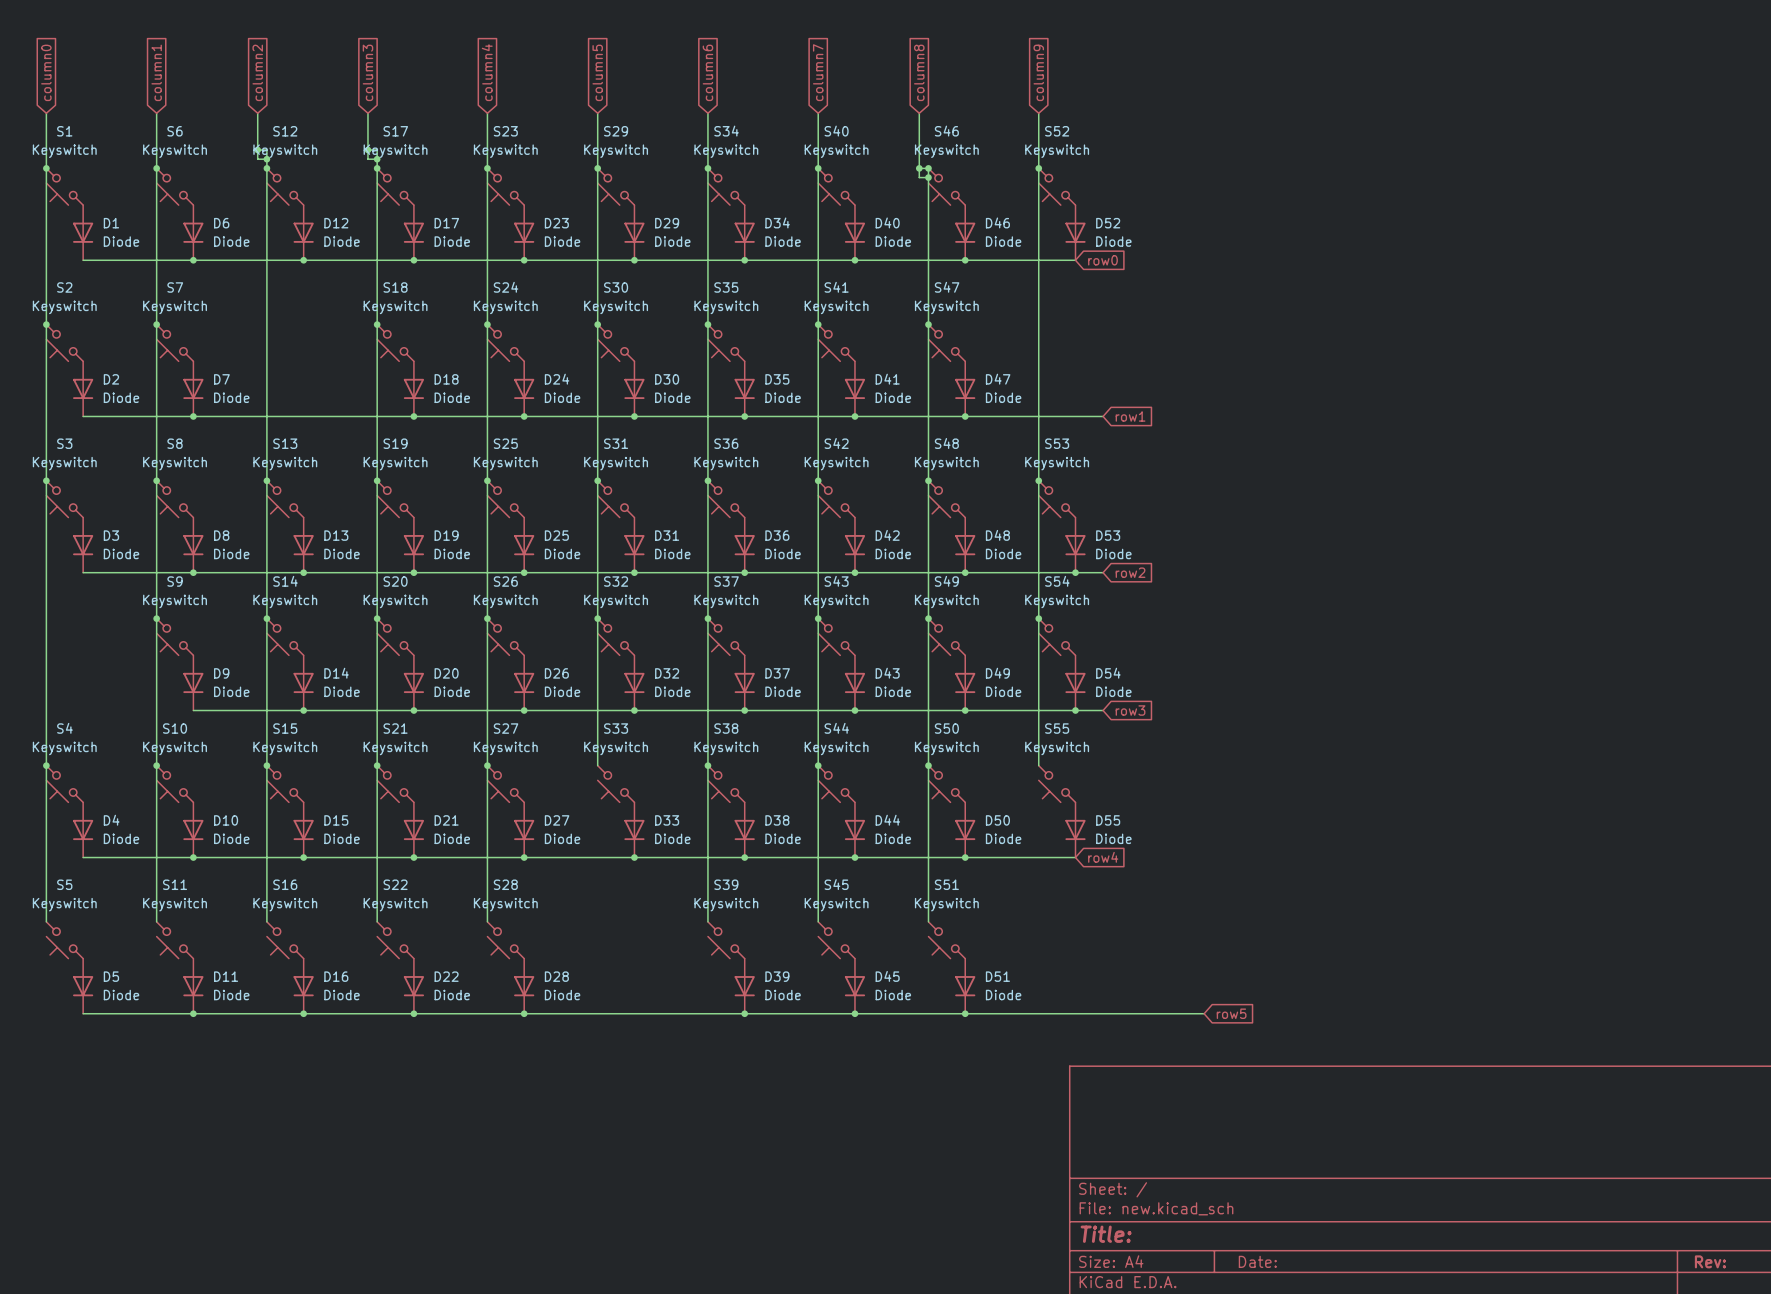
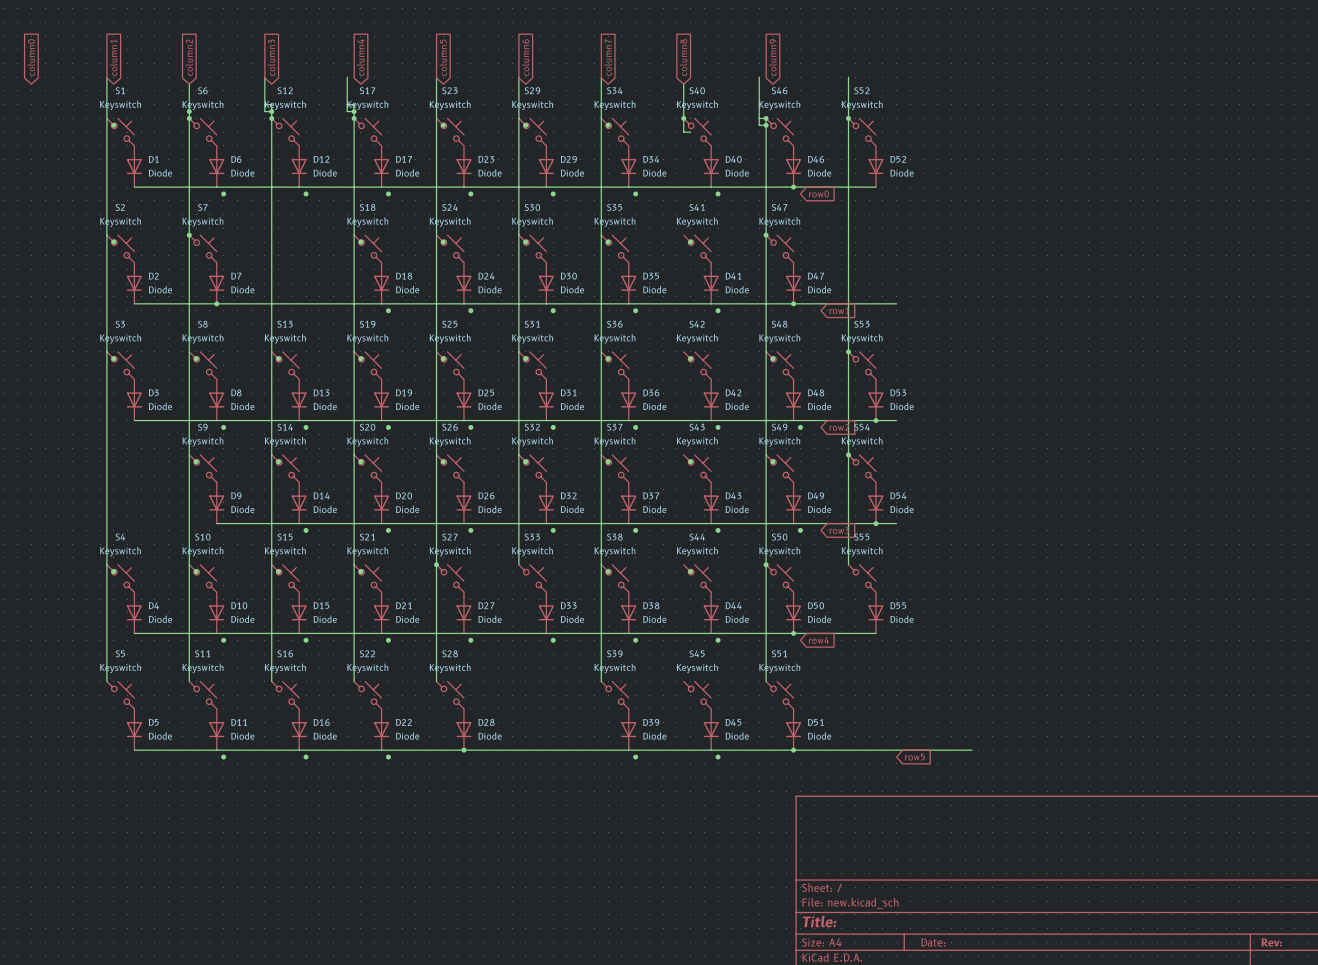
wire: none -> (347, 77) (347, 111) (354, 111)
wire: none -> (759, 77) (759, 125) (766, 125)
wire: (46, 113) (46, 921) -> (106, 77) (106, 681)
wire: (156, 113) (156, 921) -> none
wire: (367, 113) (367, 140) -> (264, 104) (271, 104)
wire: (487, 113) (487, 921) -> (436, 77) (436, 681)
wire: (597, 113) (597, 765) -> (518, 77) (518, 564)
wire: (707, 113) (707, 921) -> (601, 77) (601, 681)
wire: (818, 113) (818, 921) -> none
wire: (1038, 113) (1038, 765) -> (848, 77) (848, 564)
wire: none -> (347, 104) (354, 104) (354, 681)
wire: (257, 150) (266, 150) (266, 921) -> none
wire: (367, 150) (377, 150) (377, 921) -> (271, 111) (264, 111) (264, 77)
junction: none -> (354, 111)
wire: (257, 159) (266, 159) -> (189, 118) (189, 681)
junction: none -> (189, 118)
junction: (266, 159) -> none
wire: (367, 159) (377, 159) -> (271, 118) (271, 681)
junction: none -> (271, 118)
junction: (377, 159) -> none
junction: none -> (354, 118)
junction: none -> (683, 118)
junction: none -> (766, 118)
junction: none -> (848, 118)
junction: (46, 168) -> none
junction: (266, 168) -> none
junction: (377, 168) -> none
junction: (487, 168) -> none
wire: (919, 168) (928, 168) (928, 921) -> (759, 118) (766, 118) (766, 681)
junction: (919, 168) -> none
junction: (928, 168) -> none
junction: none -> (766, 125)
junction: (1038, 168) -> none
junction: (928, 177) -> none
S1 rotation: 0° (64, 186) -> 180° (120, 132)
S1 position: (64, 186) -> (120, 132)
S6 rotation: 0° (175, 186) -> 180° (203, 132)
S6 position: (175, 186) -> (203, 132)
S12 rotation: 0° (285, 186) -> 180° (285, 132)
S12 position: (285, 186) -> (285, 132)
S17 rotation: 0° (395, 186) -> 180° (367, 132)
S17 position: (395, 186) -> (367, 132)
S23 rotation: 0° (505, 186) -> 180° (450, 132)
S23 position: (505, 186) -> (450, 132)
S29 rotation: 0° (616, 186) -> 180° (532, 132)
S29 position: (616, 186) -> (532, 132)
S34 rotation: 0° (726, 186) -> 180° (615, 132)
S34 position: (726, 186) -> (615, 132)
S40 rotation: 0° (836, 186) -> 180° (697, 132)
S40 position: (836, 186) -> (697, 132)
S46 rotation: 0° (946, 186) -> 180° (779, 132)
S46 position: (946, 186) -> (779, 132)
S52 rotation: 0° (1057, 186) -> 180° (862, 132)
S52 position: (1057, 186) -> (862, 132)
D1 position: (83, 232) -> (134, 166)
D6 position: (193, 232) -> (216, 166)
D12 position: (303, 232) -> (299, 166)
D17 position: (413, 232) -> (381, 166)
D23 position: (524, 232) -> (463, 166)
D29 position: (634, 232) -> (546, 166)
D34 position: (744, 232) -> (628, 166)
D40 position: (854, 232) -> (711, 166)
D46 position: (965, 232) -> (793, 166)
D52 position: (1075, 232) -> (875, 166)
junction: none -> (793, 187)
wire: (83, 260) (1075, 260) -> (134, 187) (875, 187)
junction: (193, 260) -> none
junction: none -> (189, 235)
junction: none -> (766, 235)
junction: (46, 324) -> none
junction: (377, 324) -> none
S2 rotation: 0° (64, 342) -> 180° (120, 248)
S2 position: (64, 342) -> (120, 248)
S7 rotation: 0° (175, 342) -> 180° (203, 248)
S7 position: (175, 342) -> (203, 248)
S18 rotation: 0° (395, 342) -> 180° (367, 248)
S18 position: (395, 342) -> (367, 248)
S24 rotation: 0° (505, 342) -> 180° (450, 248)
S24 position: (505, 342) -> (450, 248)
S30 rotation: 0° (616, 342) -> 180° (532, 248)
S30 position: (616, 342) -> (532, 248)
S35 rotation: 0° (726, 342) -> 180° (615, 248)
S35 position: (726, 342) -> (615, 248)
S41 rotation: 0° (836, 342) -> 180° (697, 248)
S41 position: (836, 342) -> (697, 248)
S47 rotation: 0° (946, 342) -> 180° (779, 248)
S47 position: (946, 342) -> (779, 248)
D2 position: (83, 388) -> (134, 283)
D7 position: (193, 388) -> (216, 283)
D18 position: (413, 388) -> (381, 283)
D24 position: (524, 388) -> (463, 283)
D30 position: (634, 388) -> (546, 283)
D35 position: (744, 388) -> (628, 283)
D41 position: (854, 388) -> (711, 283)
D47 position: (965, 388) -> (793, 283)
junction: none -> (216, 303)
junction: none -> (793, 303)
wire: (83, 416) (1103, 416) -> (134, 303) (896, 303)
junction: (193, 416) -> none
junction: (413, 416) -> none
junction: none -> (848, 351)
junction: (46, 480) -> none
S3 rotation: 0° (64, 499) -> 180° (120, 365)
S3 position: (64, 499) -> (120, 365)
S8 rotation: 0° (175, 499) -> 180° (203, 365)
S8 position: (175, 499) -> (203, 365)
S13 rotation: 0° (285, 499) -> 180° (285, 365)
S13 position: (285, 499) -> (285, 365)
S19 rotation: 0° (395, 499) -> 180° (367, 365)
S19 position: (395, 499) -> (367, 365)
S25 rotation: 0° (505, 499) -> 180° (450, 365)
S25 position: (505, 499) -> (450, 365)
S31 rotation: 0° (616, 499) -> 180° (532, 365)
S31 position: (616, 499) -> (532, 365)
S36 rotation: 0° (726, 499) -> 180° (615, 365)
S36 position: (726, 499) -> (615, 365)
S42 rotation: 0° (836, 499) -> 180° (697, 365)
S42 position: (836, 499) -> (697, 365)
S48 rotation: 0° (946, 499) -> 180° (779, 365)
S48 position: (946, 499) -> (779, 365)
S53 rotation: 0° (1057, 499) -> 180° (862, 365)
S53 position: (1057, 499) -> (862, 365)
D3 position: (83, 545) -> (134, 399)
D8 position: (193, 545) -> (216, 399)
D13 position: (303, 545) -> (299, 399)
D19 position: (413, 545) -> (381, 399)
D25 position: (524, 545) -> (463, 399)
D31 position: (634, 545) -> (546, 399)
D36 position: (744, 545) -> (628, 399)
D42 position: (854, 545) -> (711, 399)
D48 position: (965, 545) -> (793, 399)
D53 position: (1075, 545) -> (875, 399)
junction: none -> (875, 420)
wire: (83, 572) (1103, 572) -> (134, 420) (896, 420)
junction: (193, 572) -> none
junction: none -> (848, 454)
junction: (156, 618) -> none
S9 rotation: 0° (175, 637) -> 180° (203, 468)
S9 position: (175, 637) -> (203, 468)
S14 rotation: 0° (285, 637) -> 180° (285, 468)
S14 position: (285, 637) -> (285, 468)
S20 rotation: 0° (395, 637) -> 180° (367, 468)
S20 position: (395, 637) -> (367, 468)
S26 rotation: 0° (505, 637) -> 180° (450, 468)
S26 position: (505, 637) -> (450, 468)
S32 rotation: 0° (616, 637) -> 180° (532, 468)
S32 position: (616, 637) -> (532, 468)
S37 rotation: 0° (726, 637) -> 180° (615, 468)
S37 position: (726, 637) -> (615, 468)
S43 rotation: 0° (836, 637) -> 180° (697, 468)
S43 position: (836, 637) -> (697, 468)
S49 rotation: 0° (946, 637) -> 180° (779, 468)
S49 position: (946, 637) -> (779, 468)
S54 rotation: 0° (1057, 637) -> 180° (862, 468)
S54 position: (1057, 637) -> (862, 468)
D9 position: (193, 682) -> (216, 502)
D14 position: (303, 682) -> (299, 502)
D20 position: (413, 682) -> (381, 502)
D26 position: (524, 682) -> (463, 502)
D32 position: (634, 682) -> (546, 502)
D37 position: (744, 682) -> (628, 502)
D43 position: (854, 682) -> (711, 502)
D49 position: (965, 682) -> (793, 502)
D54 position: (1075, 682) -> (875, 502)
junction: none -> (875, 523)
wire: (193, 710) (1103, 710) -> (216, 523) (896, 523)
junction: (303, 710) -> none
junction: none -> (436, 564)
junction: none -> (766, 564)
junction: (46, 765) -> none
junction: (707, 765) -> none
S4 rotation: 0° (64, 784) -> 180° (120, 578)
S4 position: (64, 784) -> (120, 578)
S10 rotation: 0° (175, 784) -> 180° (203, 578)
S10 position: (175, 784) -> (203, 578)
S15 rotation: 0° (285, 784) -> 180° (285, 578)
S15 position: (285, 784) -> (285, 578)
S21 rotation: 0° (395, 784) -> 180° (367, 578)
S21 position: (395, 784) -> (367, 578)
S27 rotation: 0° (505, 784) -> 180° (450, 578)
S27 position: (505, 784) -> (450, 578)
S33 rotation: 0° (616, 784) -> 180° (532, 578)
S33 position: (616, 784) -> (532, 578)
S38 rotation: 0° (726, 784) -> 180° (615, 578)
S38 position: (726, 784) -> (615, 578)
S44 rotation: 0° (836, 784) -> 180° (697, 578)
S44 position: (836, 784) -> (697, 578)
S50 rotation: 0° (946, 784) -> 180° (779, 578)
S50 position: (946, 784) -> (779, 578)
S55 rotation: 0° (1057, 784) -> 180° (862, 578)
S55 position: (1057, 784) -> (862, 578)
D4 position: (83, 829) -> (134, 612)
D10 position: (193, 829) -> (216, 612)
D15 position: (303, 829) -> (299, 612)
D21 position: (413, 829) -> (381, 612)
D27 position: (524, 829) -> (463, 612)
D33 position: (634, 829) -> (546, 612)
D38 position: (744, 829) -> (628, 612)
D44 position: (854, 829) -> (711, 612)
D50 position: (965, 829) -> (793, 612)
D55 position: (1075, 829) -> (875, 612)
junction: none -> (793, 633)
wire: (83, 857) (1075, 857) -> (134, 633) (875, 633)
junction: (193, 857) -> none
S5 rotation: 0° (64, 940) -> 180° (120, 695)
S5 position: (64, 940) -> (120, 695)
S11 rotation: 0° (175, 940) -> 180° (203, 695)
S11 position: (175, 940) -> (203, 695)
S16 rotation: 0° (285, 940) -> 180° (285, 695)
S16 position: (285, 940) -> (285, 695)
S22 rotation: 0° (395, 940) -> 180° (367, 695)
S22 position: (395, 940) -> (367, 695)
S28 rotation: 0° (505, 940) -> 180° (450, 695)
S28 position: (505, 940) -> (450, 695)
S39 rotation: 0° (726, 940) -> 180° (615, 695)
S39 position: (726, 940) -> (615, 695)
S45 rotation: 0° (836, 940) -> 180° (697, 695)
S45 position: (836, 940) -> (697, 695)
S51 rotation: 0° (946, 940) -> 180° (779, 695)
S51 position: (946, 940) -> (779, 695)
D5 position: (83, 986) -> (134, 729)
D11 position: (193, 986) -> (216, 729)
D16 position: (303, 986) -> (299, 729)
D22 position: (413, 986) -> (381, 729)
D28 position: (524, 986) -> (463, 729)
D39 position: (744, 986) -> (628, 729)
D45 position: (854, 986) -> (711, 729)
D51 position: (965, 986) -> (793, 729)
junction: none -> (463, 750)
junction: none -> (793, 750)
wire: (83, 1013) (1204, 1013) -> (134, 750) (972, 750)
junction: (193, 1013) -> none
junction: (744, 1013) -> none

